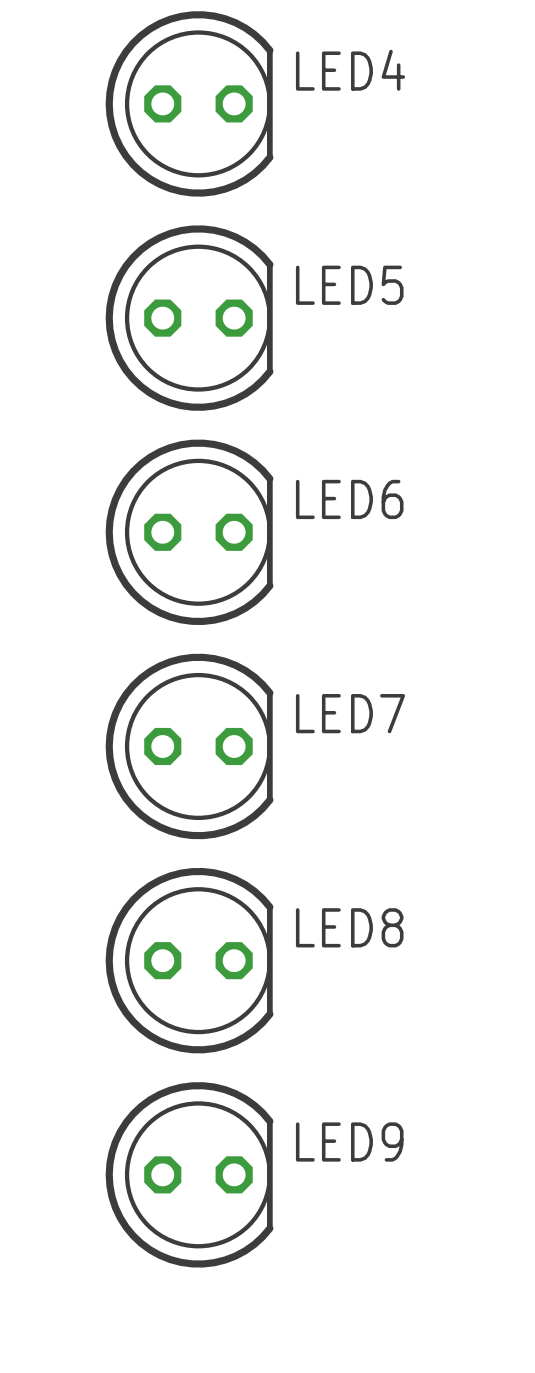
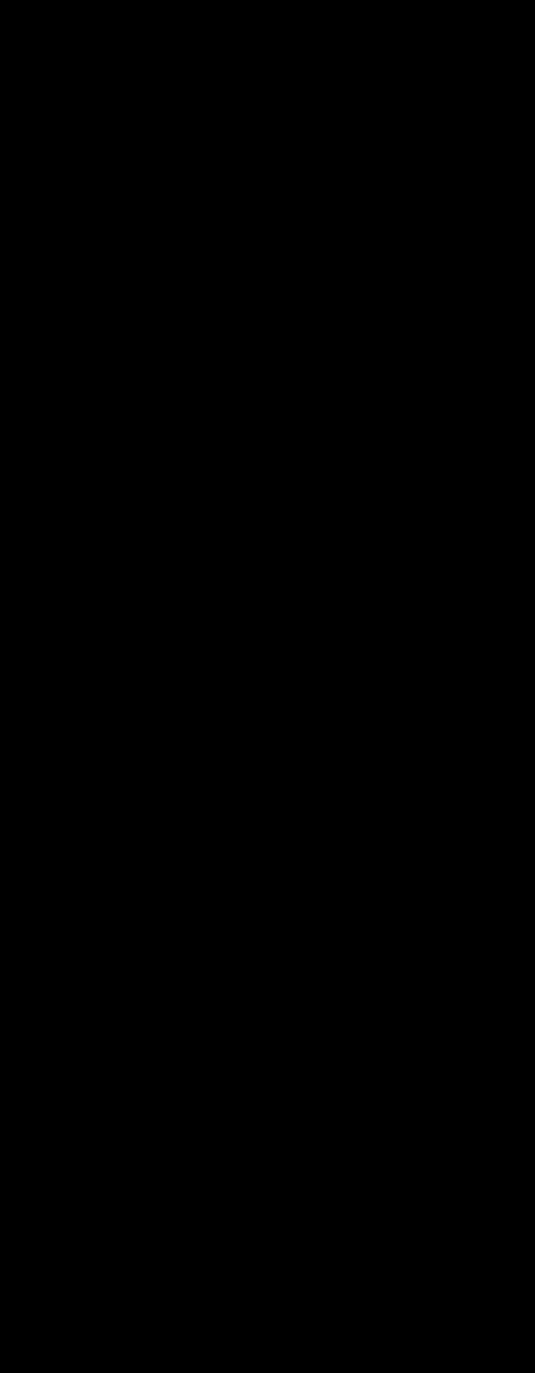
LED4: (189, 103) -> none
LED5: (189, 318) -> none
LED6: (189, 532) -> none
LED7: (189, 746) -> none
LED8: (189, 960) -> none
LED9: (189, 1174) -> none

